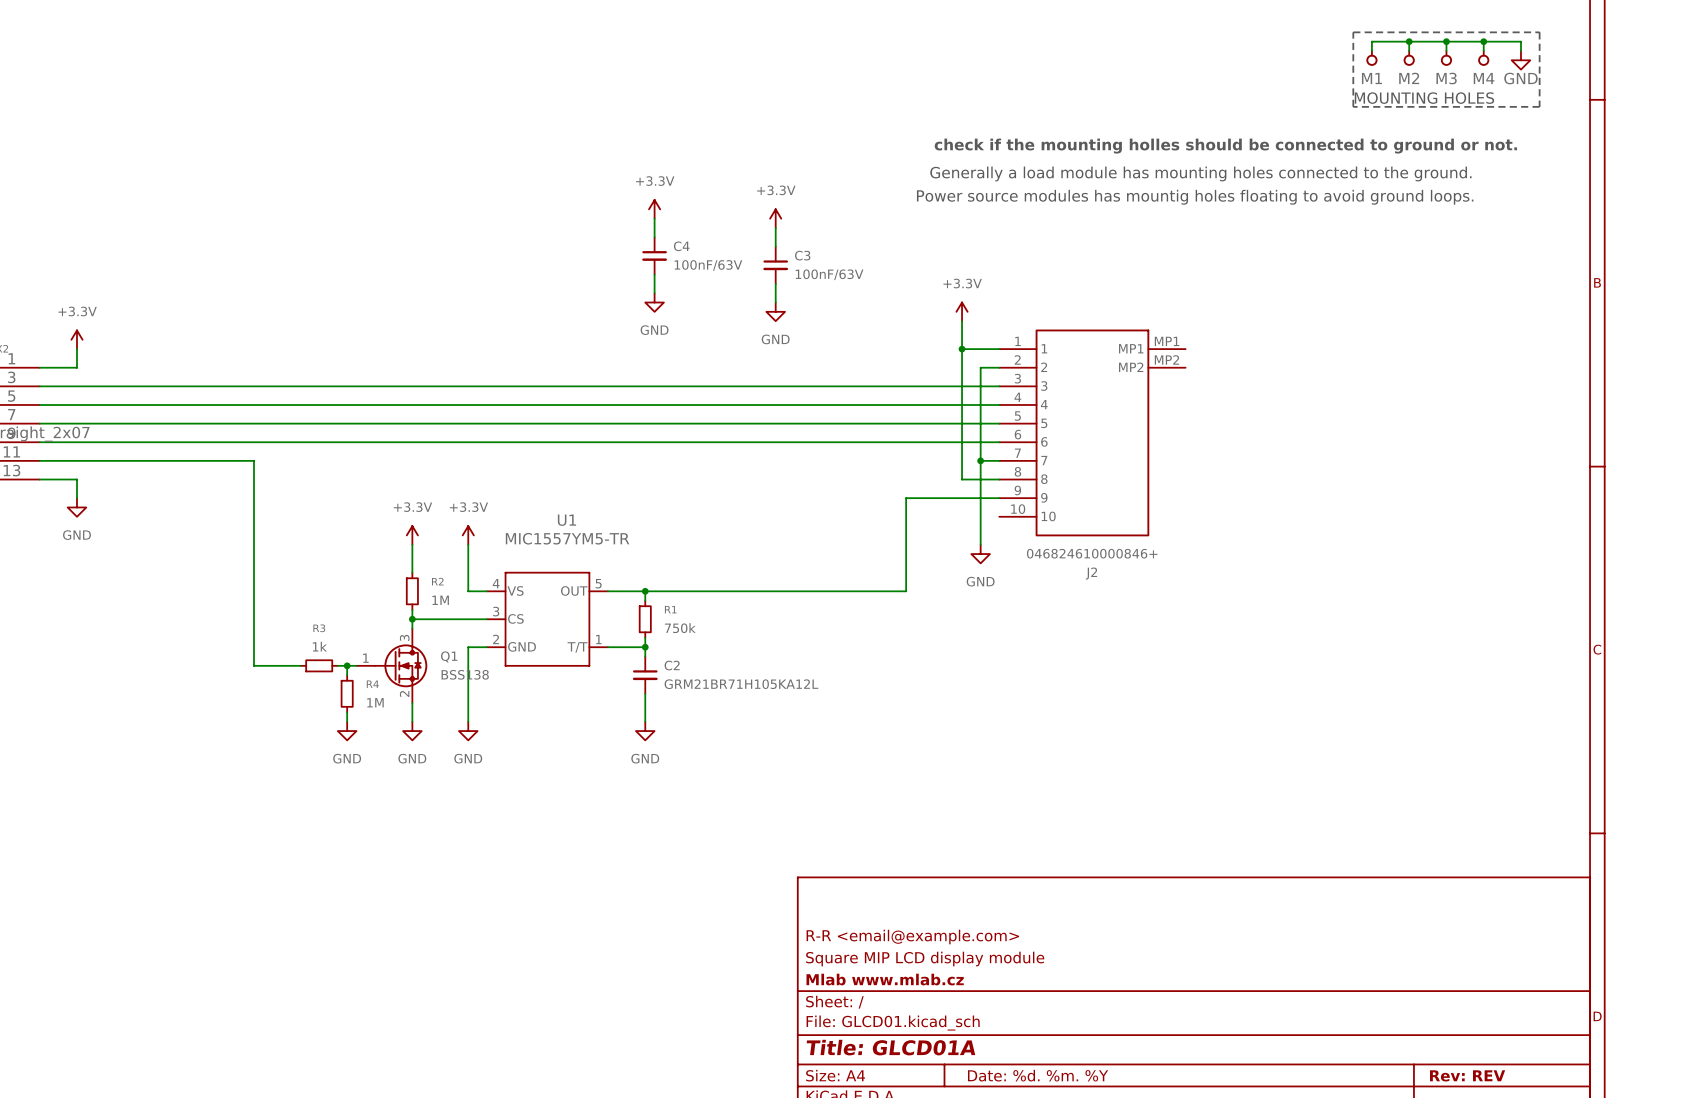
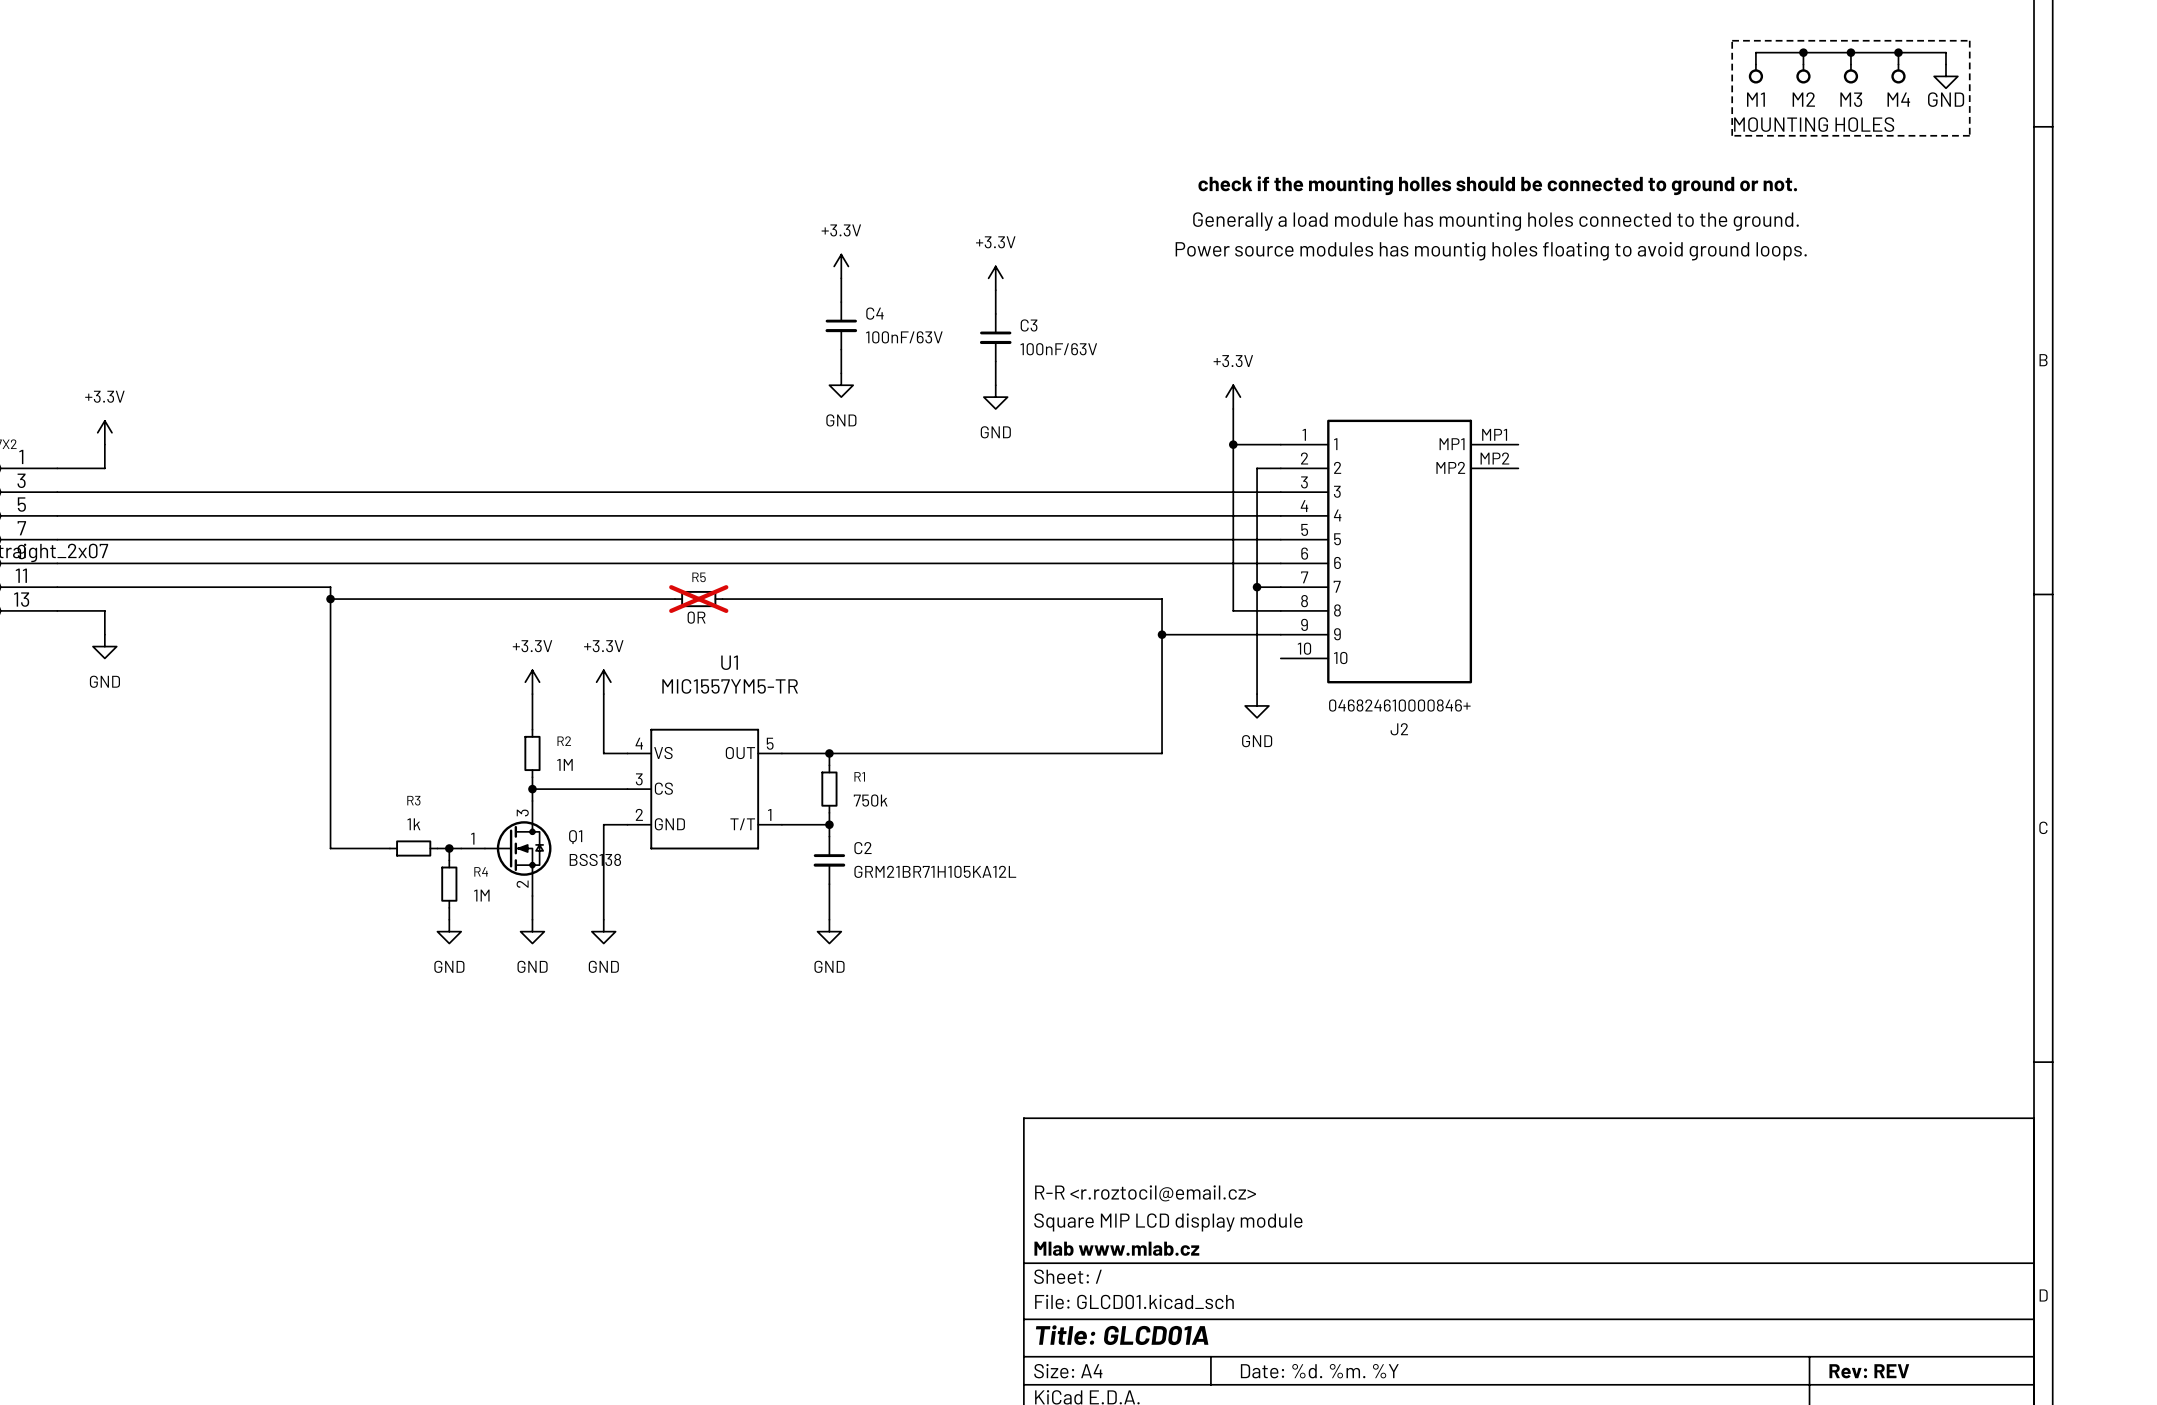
wire: none -> (330, 599) (675, 599)
junction: none -> (330, 599)
R5: none -> 0R (698, 599)
wire: none -> (722, 599) (1162, 599) (1162, 634)
junction: none -> (1162, 634)
title block: R-R <email@example.com> (912, 937) -> R-R <r.roztocil@email.cz> (1145, 1193)

